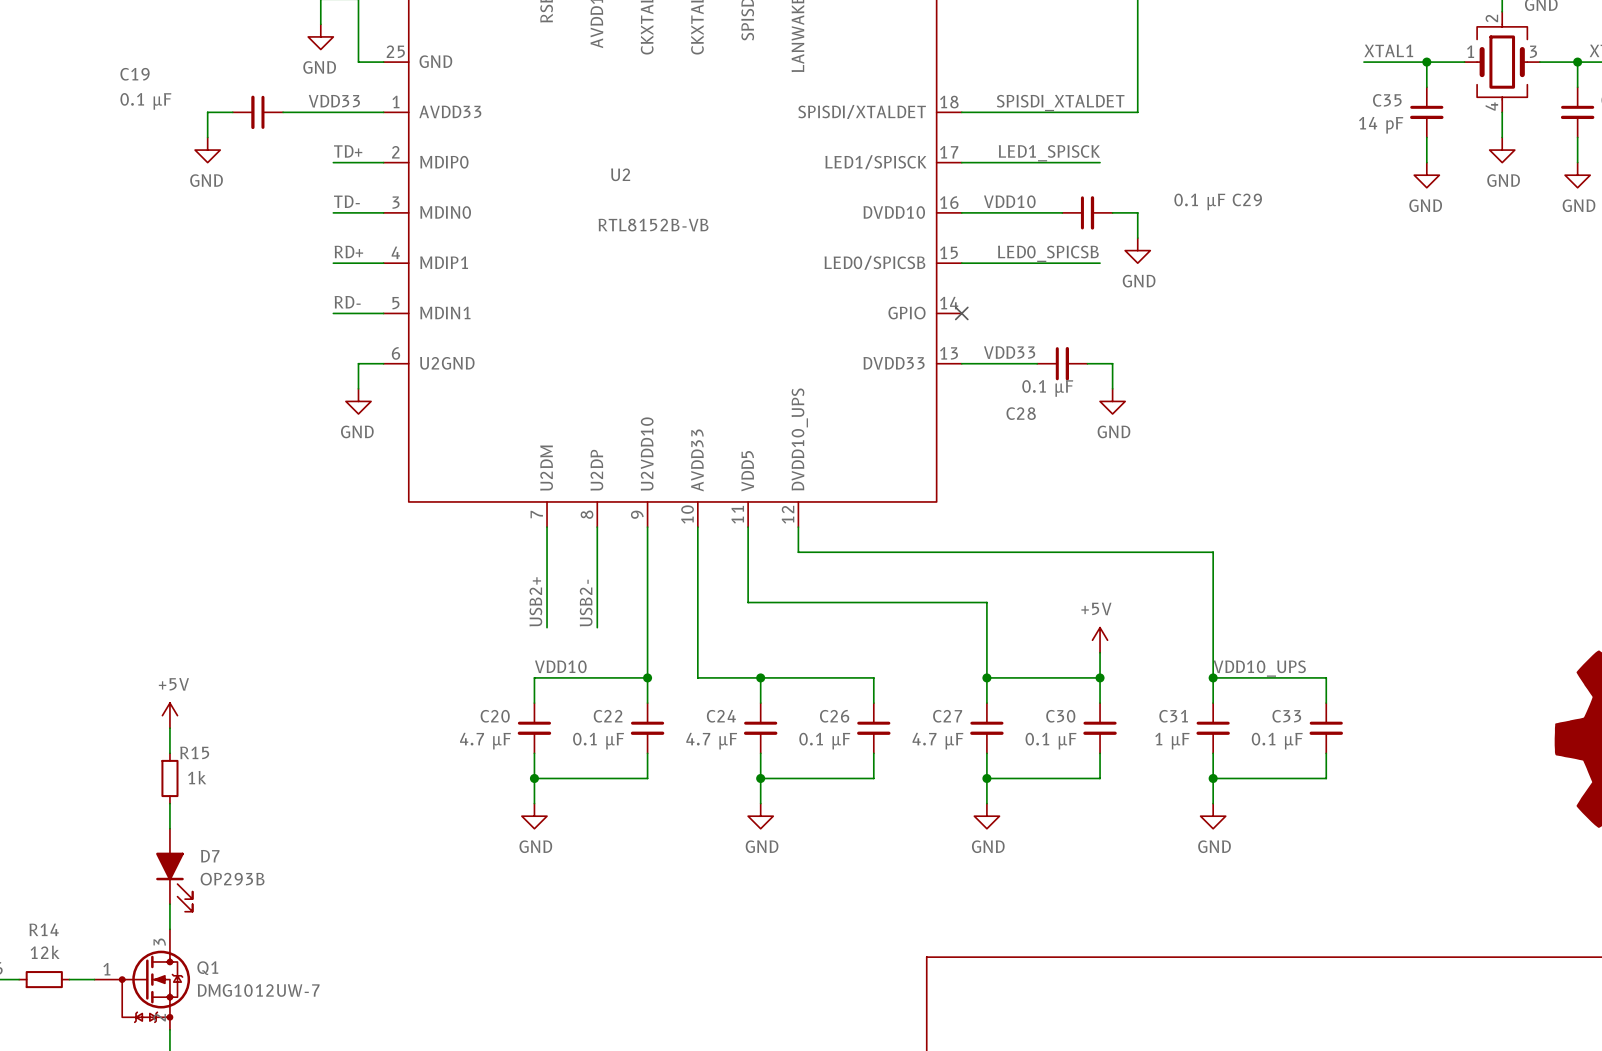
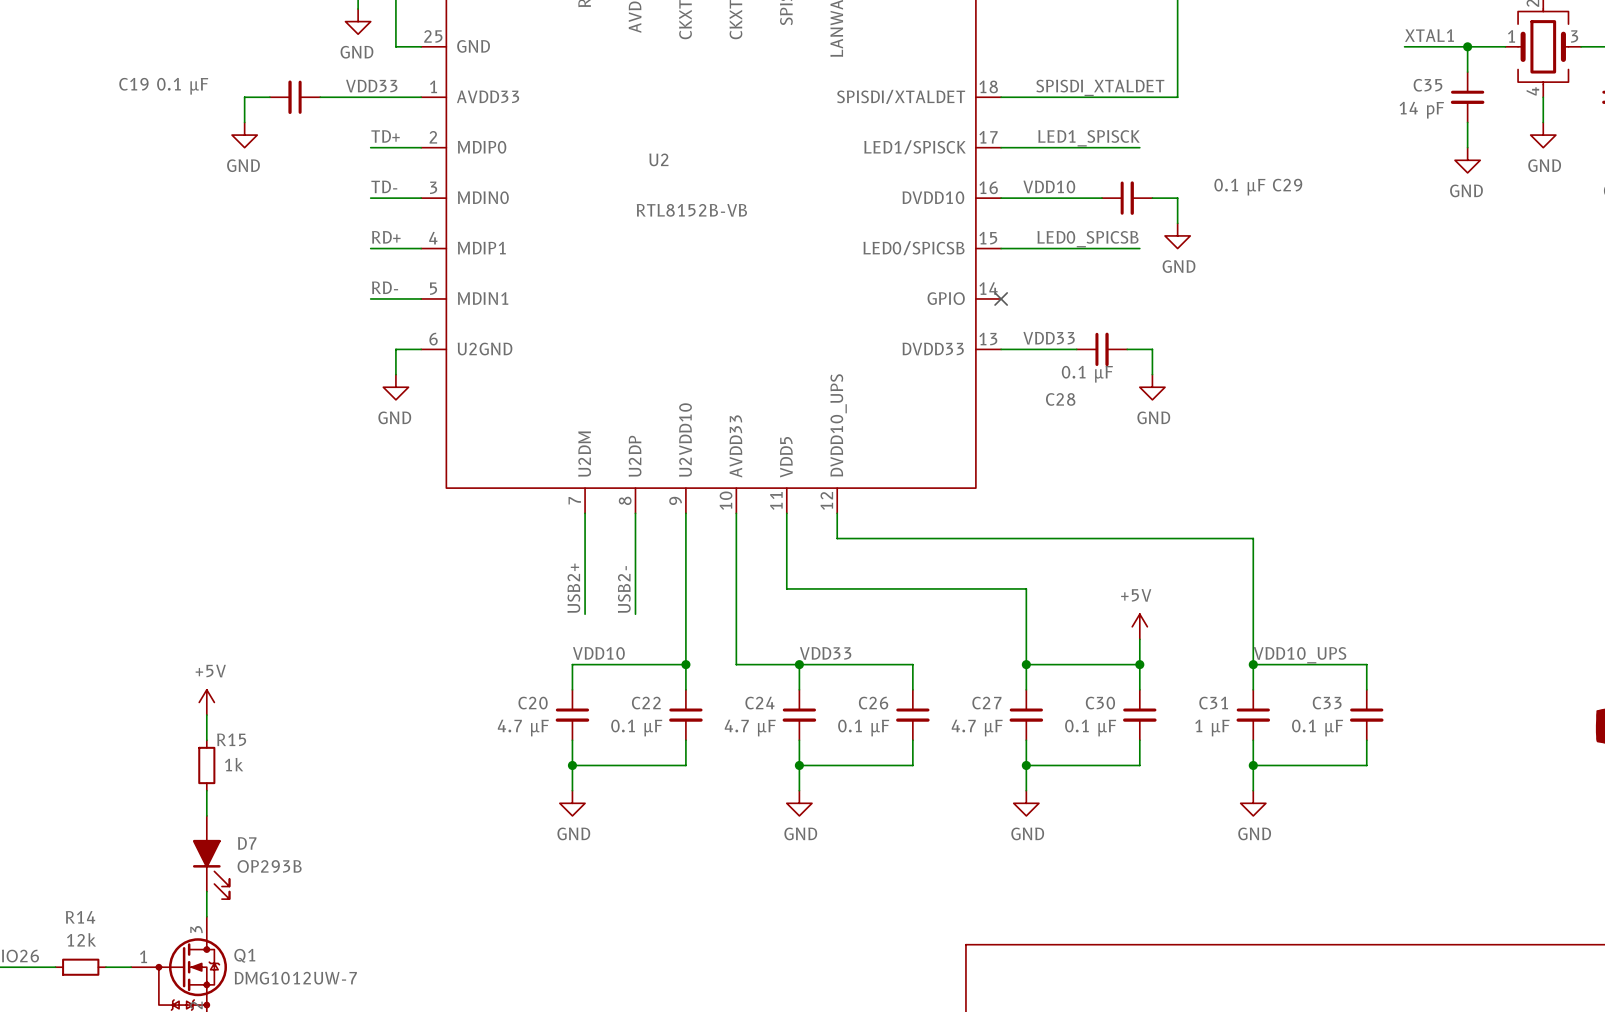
C19 name position: C19 (135, 74) -> C19 (133, 84)
label: none -> VDD33 (825, 653)

